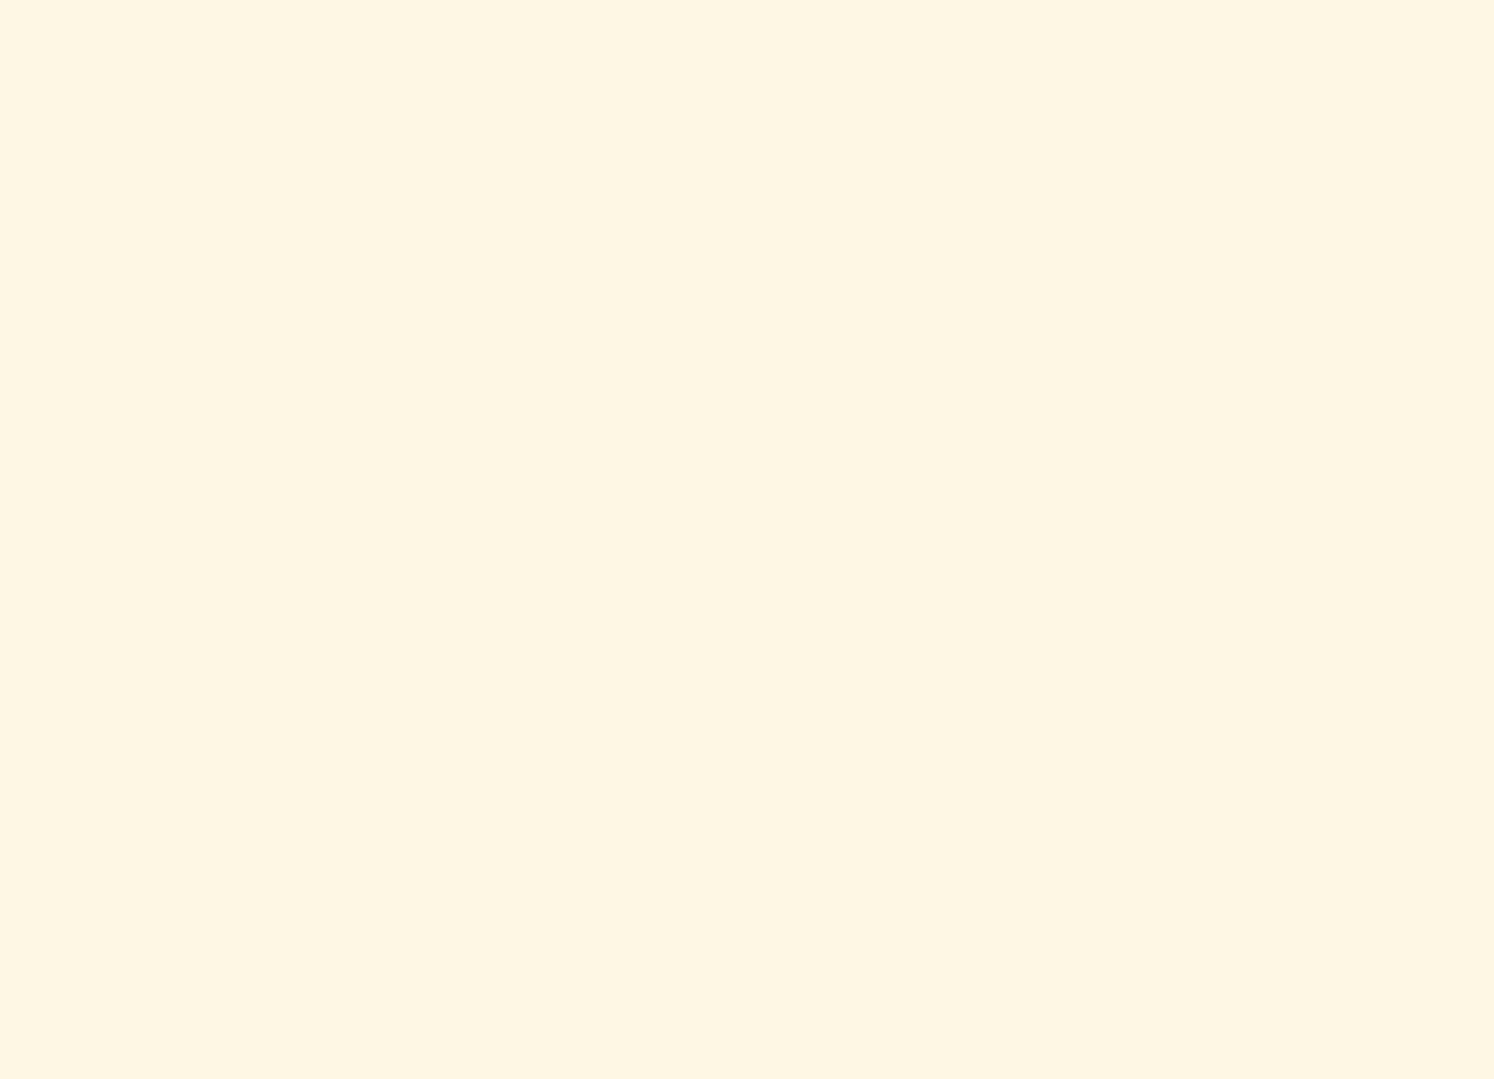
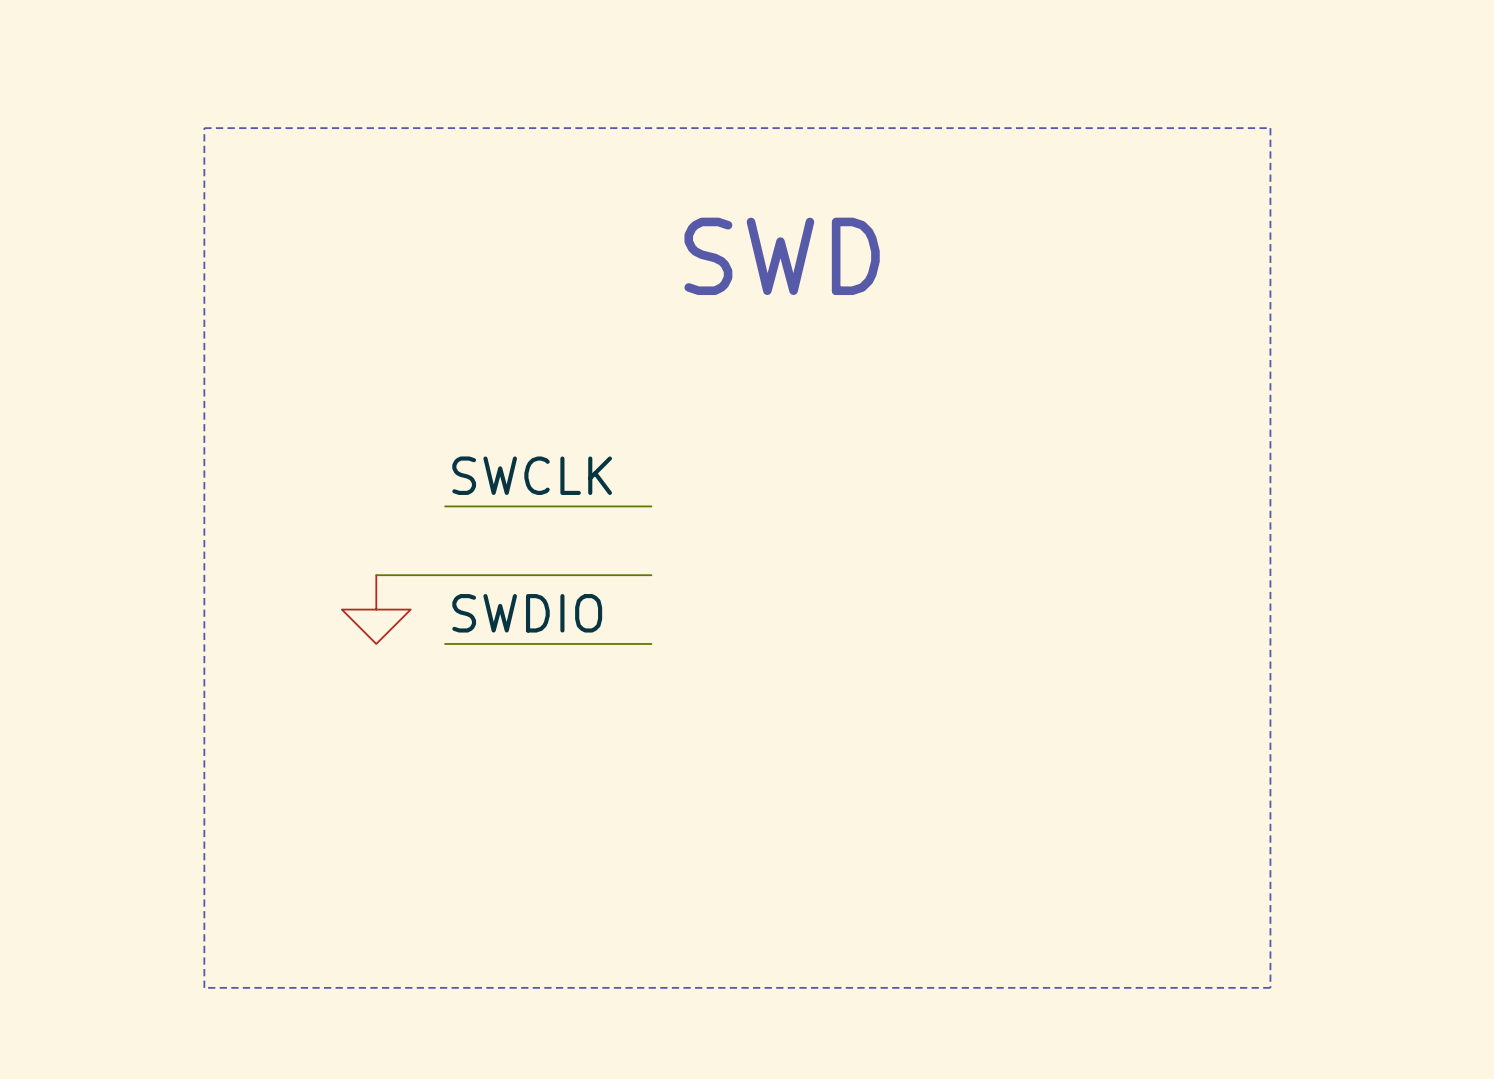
line: none -> (204, 128) (1270, 128) (1270, 987) (204, 987) (204, 128)
text: none -> SWD (782, 256)
label: none -> SWCLK (532, 475)
wire: none -> (445, 506) (651, 506)
wire: none -> (376, 575) (651, 575)
power symbol: none -> (376, 609)
label: none -> SWDIO (527, 613)
wire: none -> (445, 643) (651, 643)

